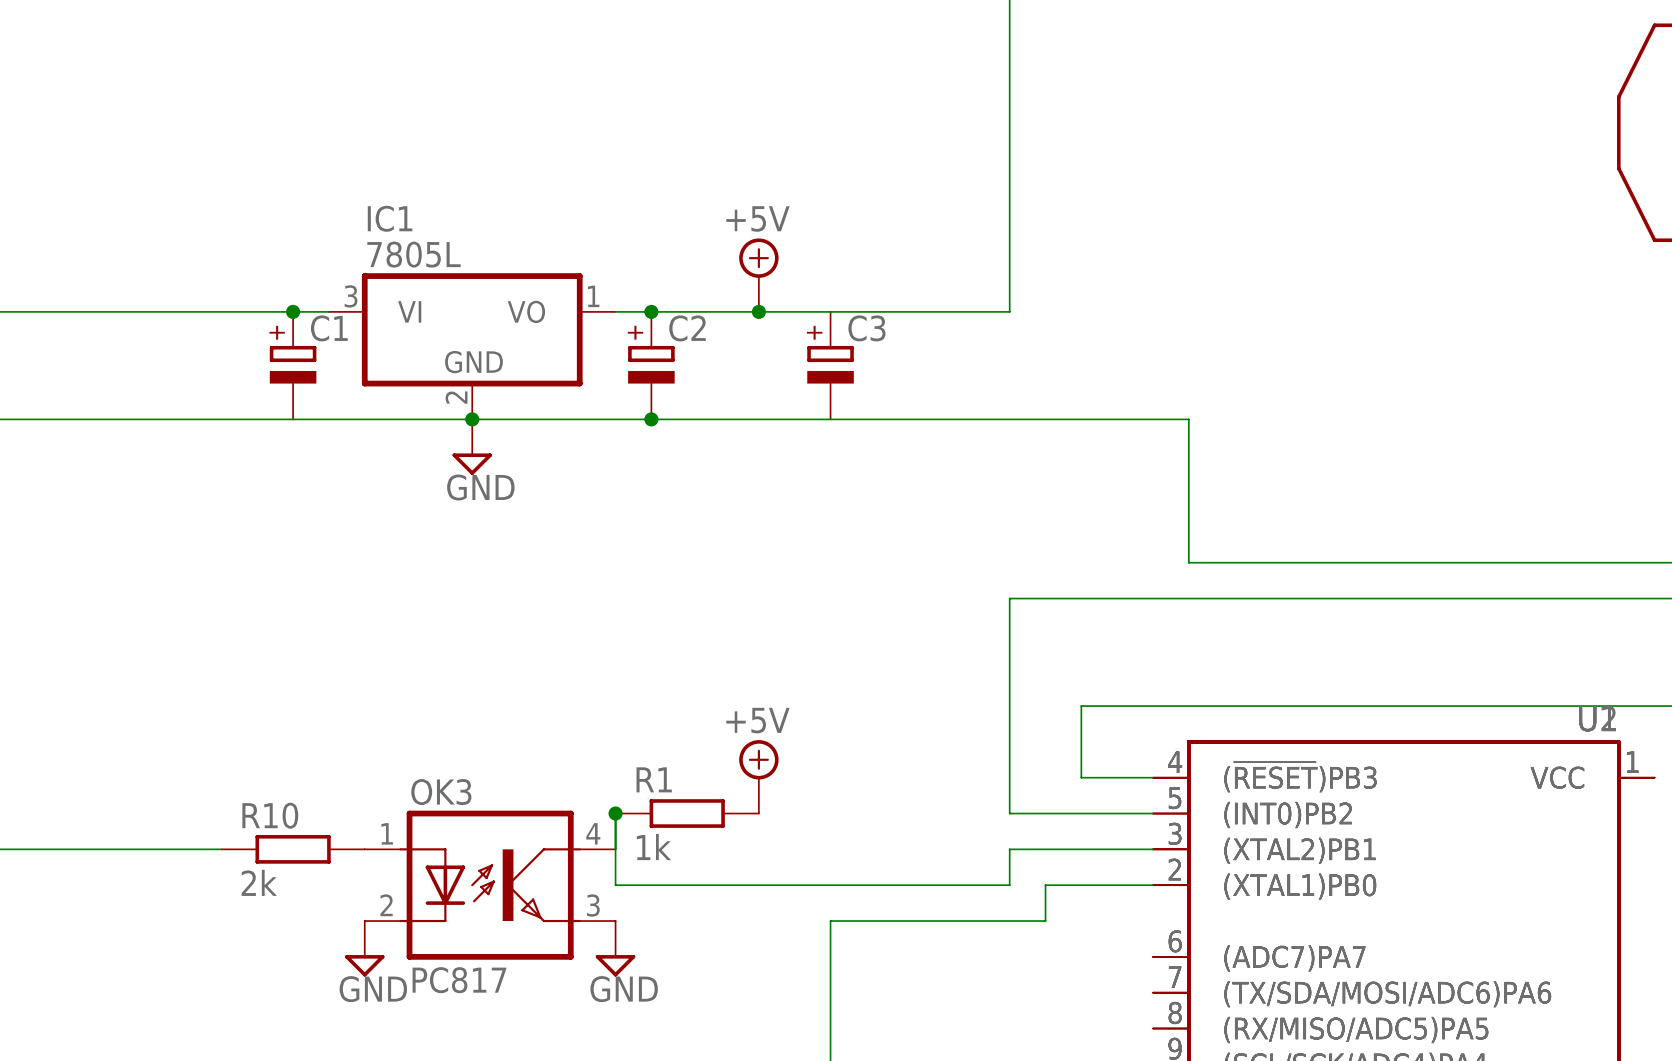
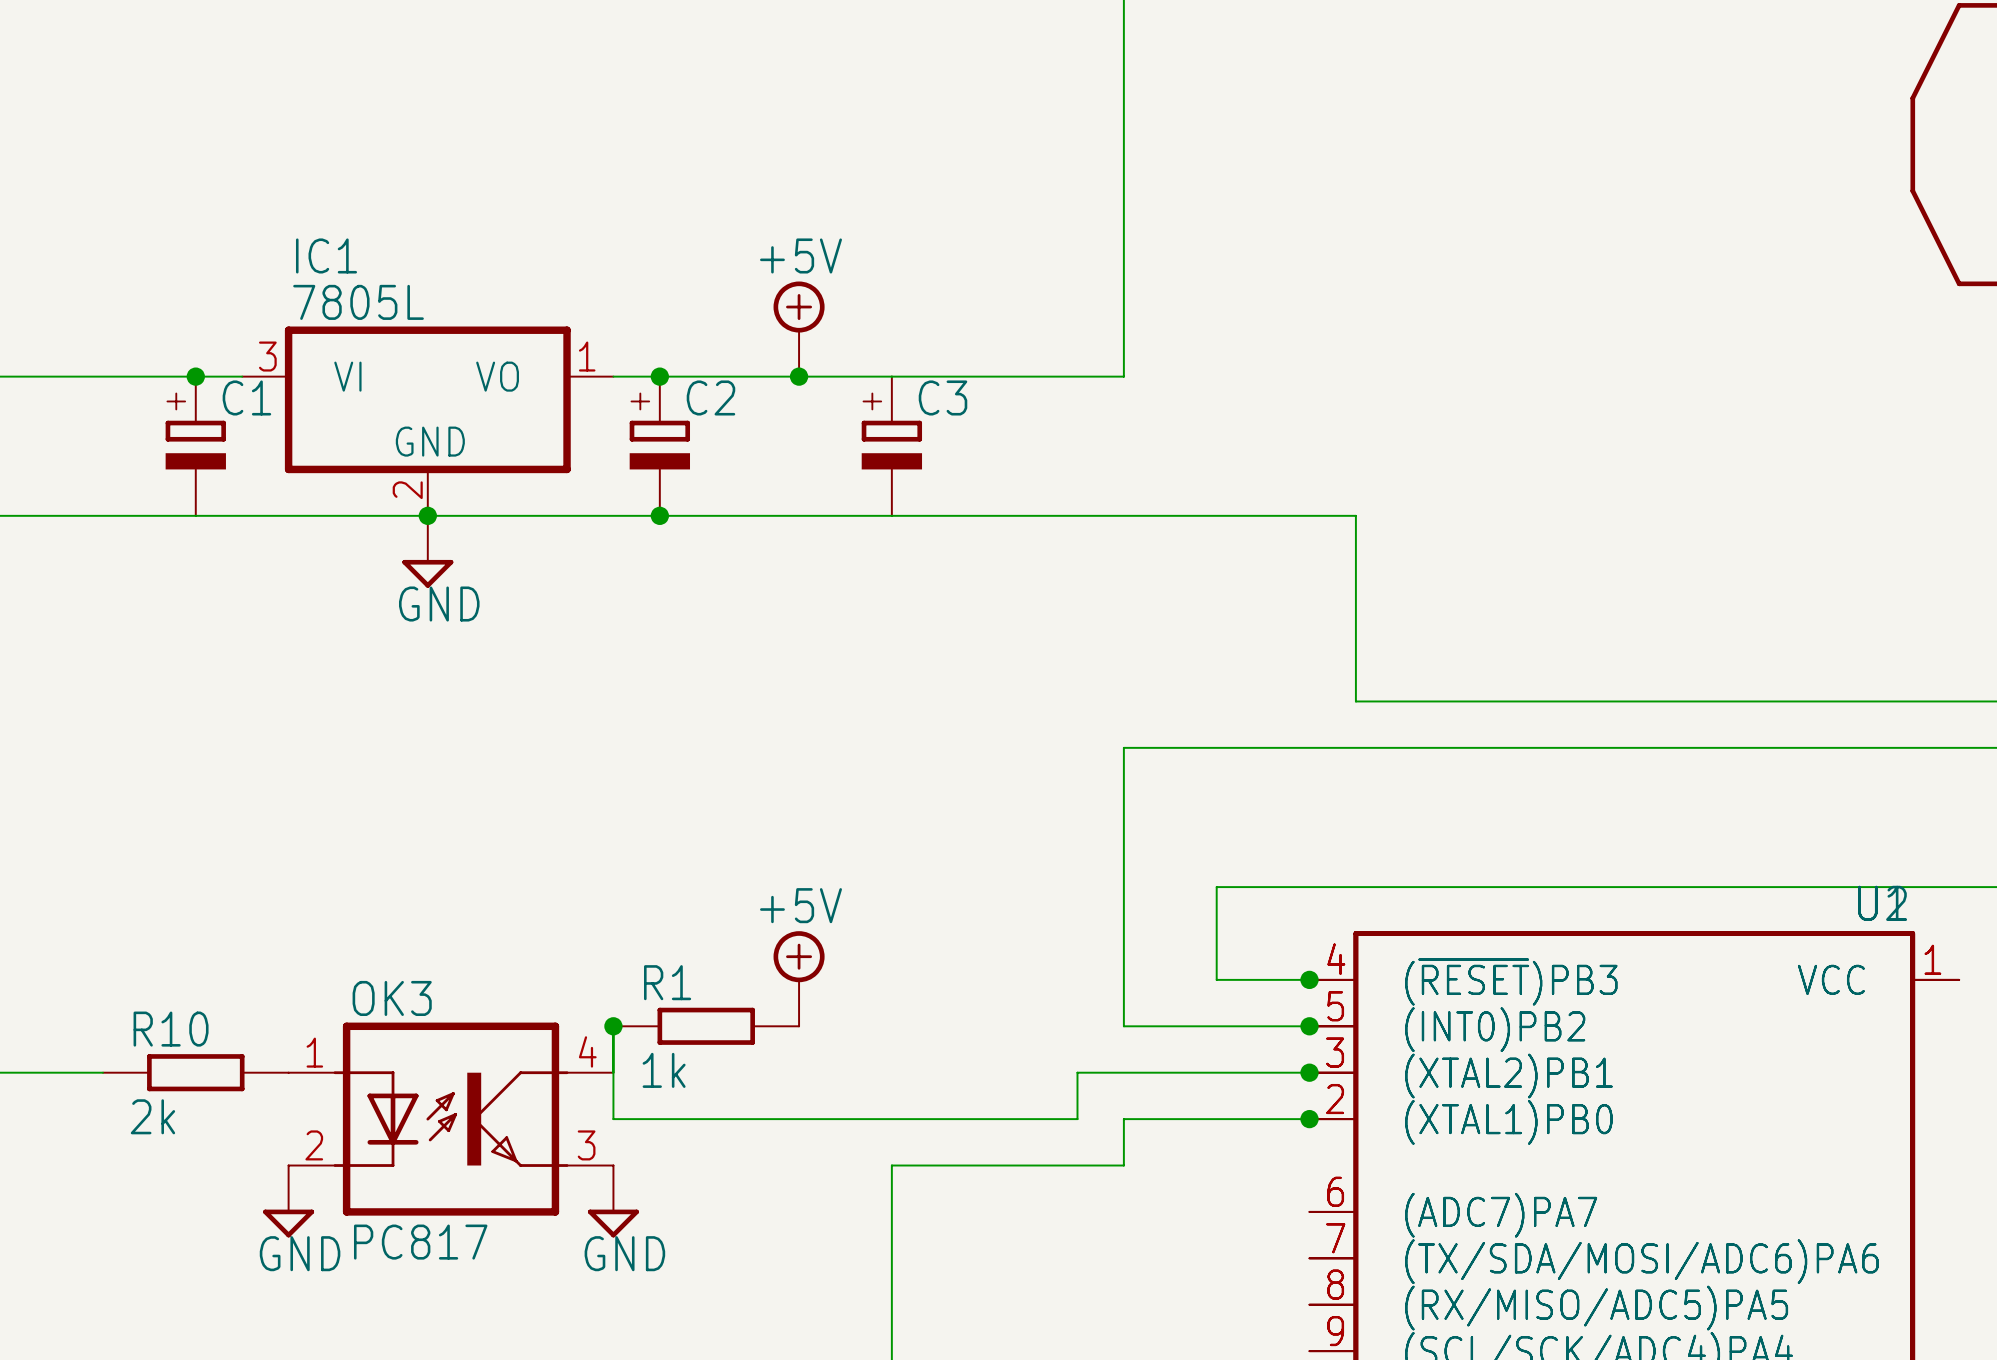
junction: none -> (1309, 979)
junction: none -> (1309, 1026)
wire: (1009, 849) (1009, 885) (973, 885) -> (1123, 1072) (1077, 1072) (1077, 1119)
junction: none -> (1309, 1072)
wire: (1045, 885) (1045, 921) (1009, 921) -> (1170, 1119) (1123, 1119) (1123, 1165)
junction: none -> (1309, 1119)

